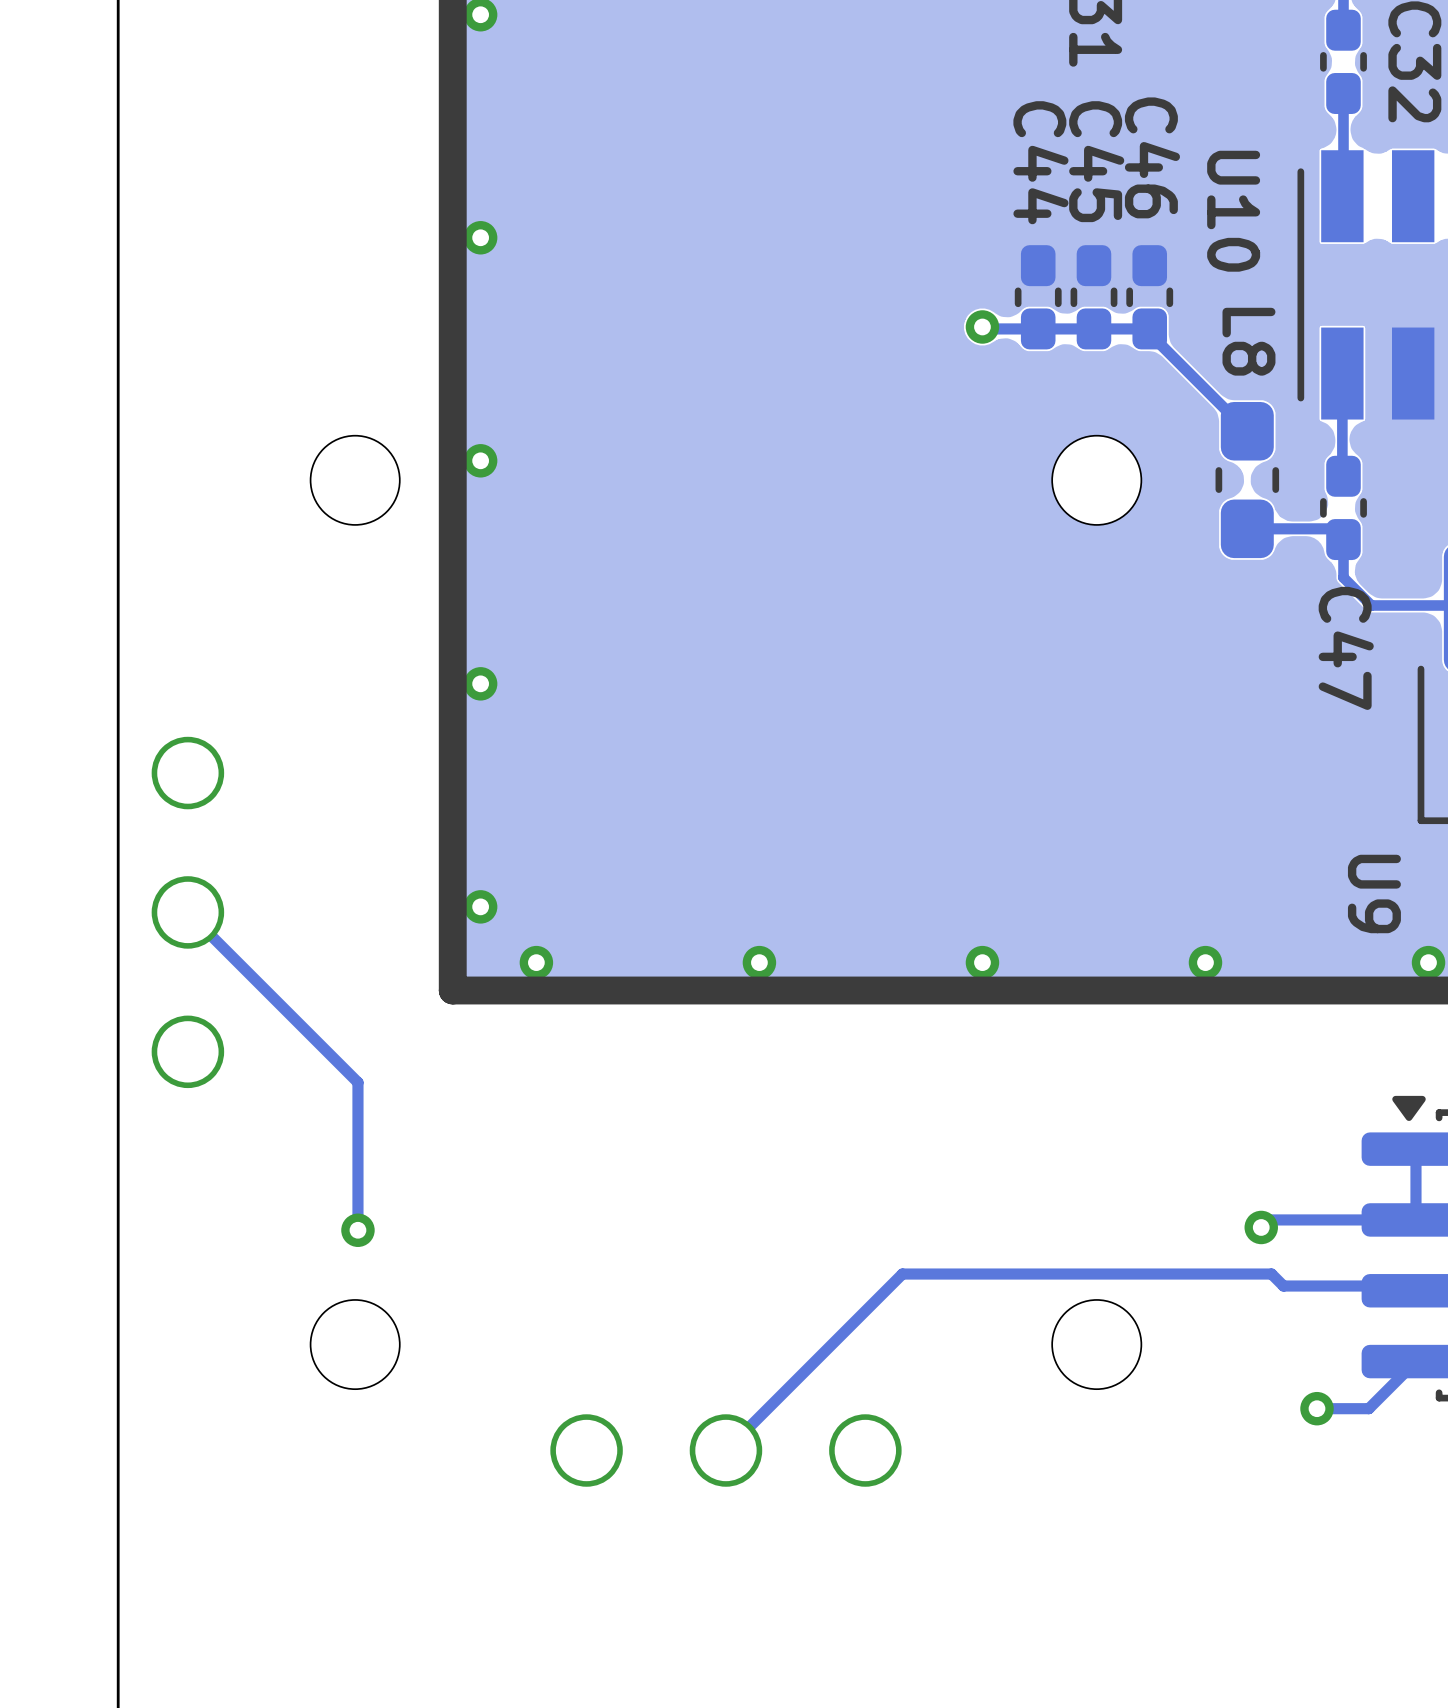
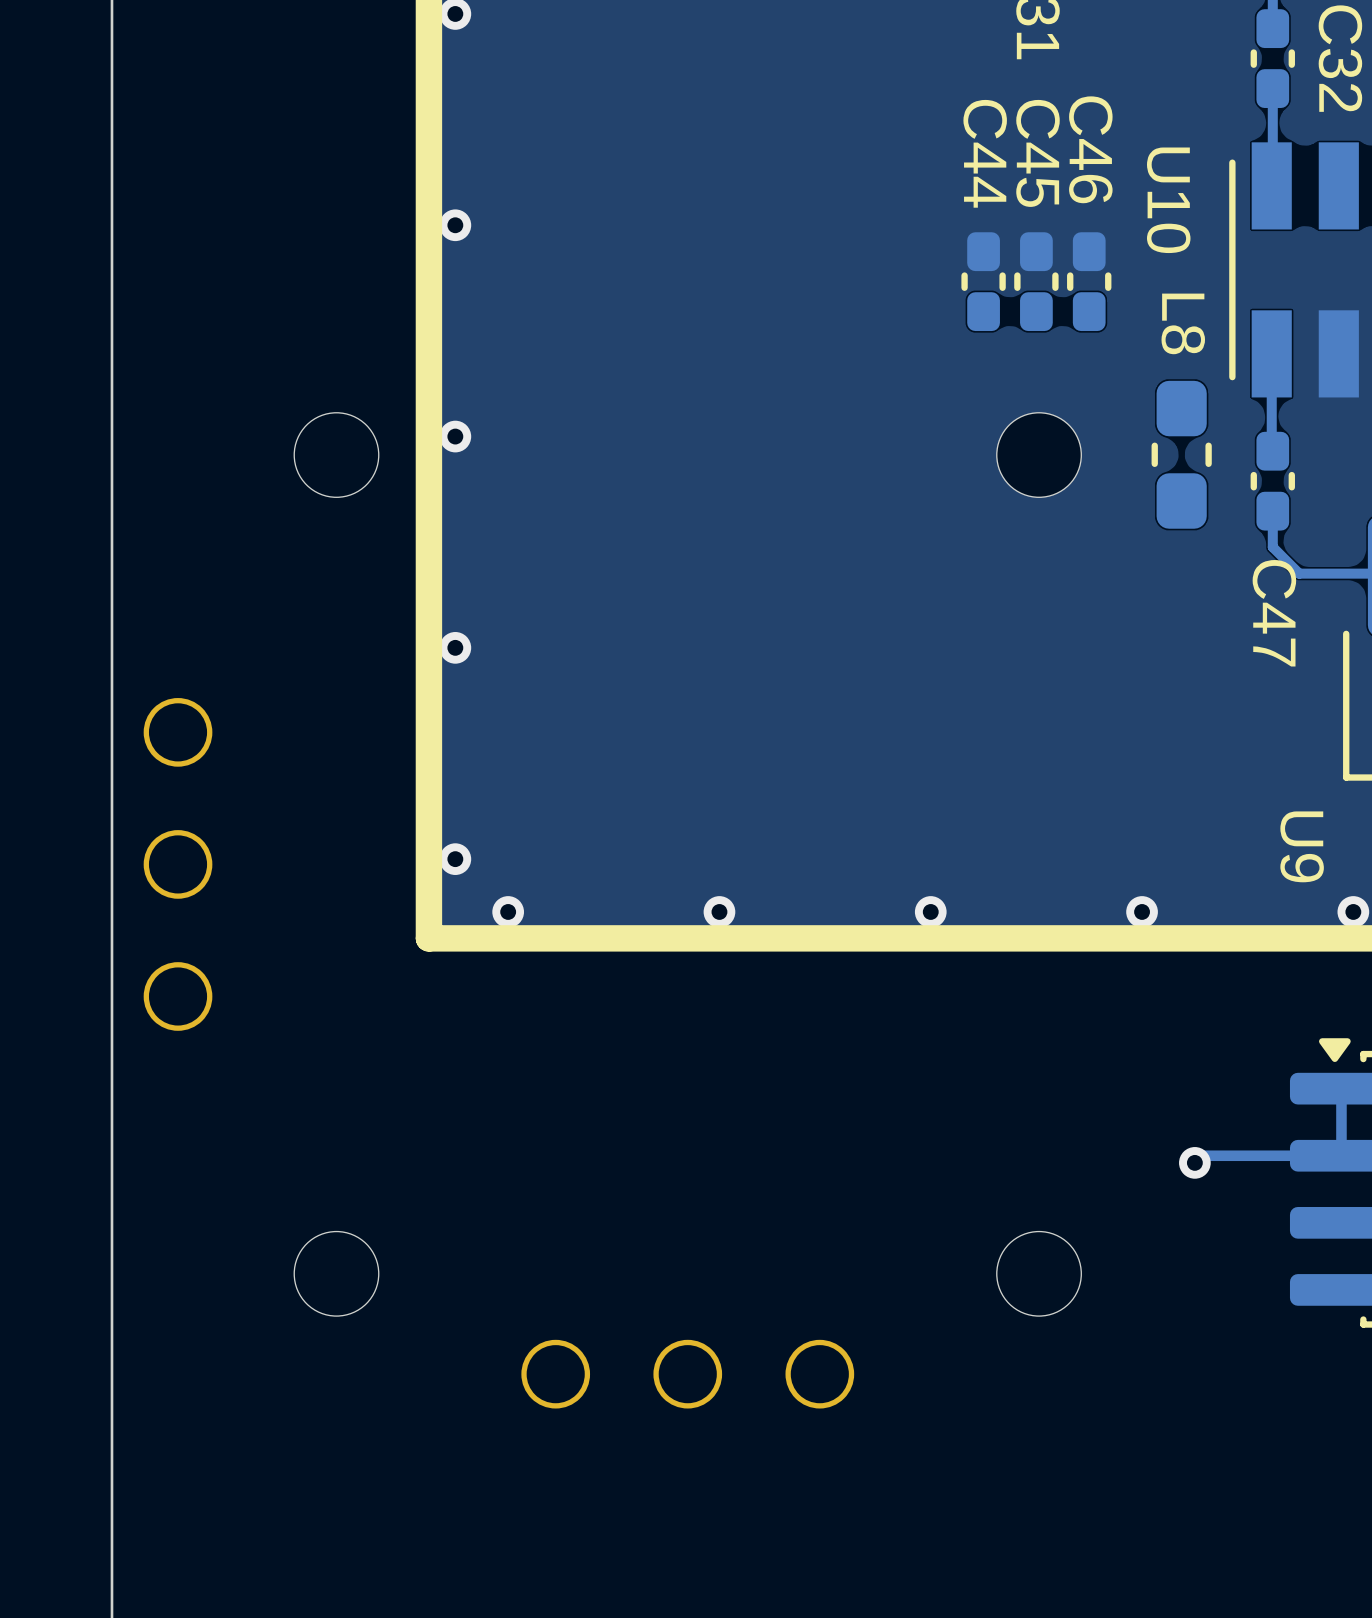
track: (982, 326) (984, 328) (1144, 328) (1247, 431) -> none
via: (982, 326) -> none
track: (1247, 528) (1332, 528) (1343, 539) -> none
track: (187, 912) (357, 1082) (357, 1230) -> none
via: (357, 1230) -> none
track: (1415, 1290) (1411, 1286) (1283, 1286) (1271, 1274) (902, 1274) (725, 1450) -> none
track: (1415, 1361) (1368, 1408) (1317, 1408) -> none
via: (1317, 1408) -> none

